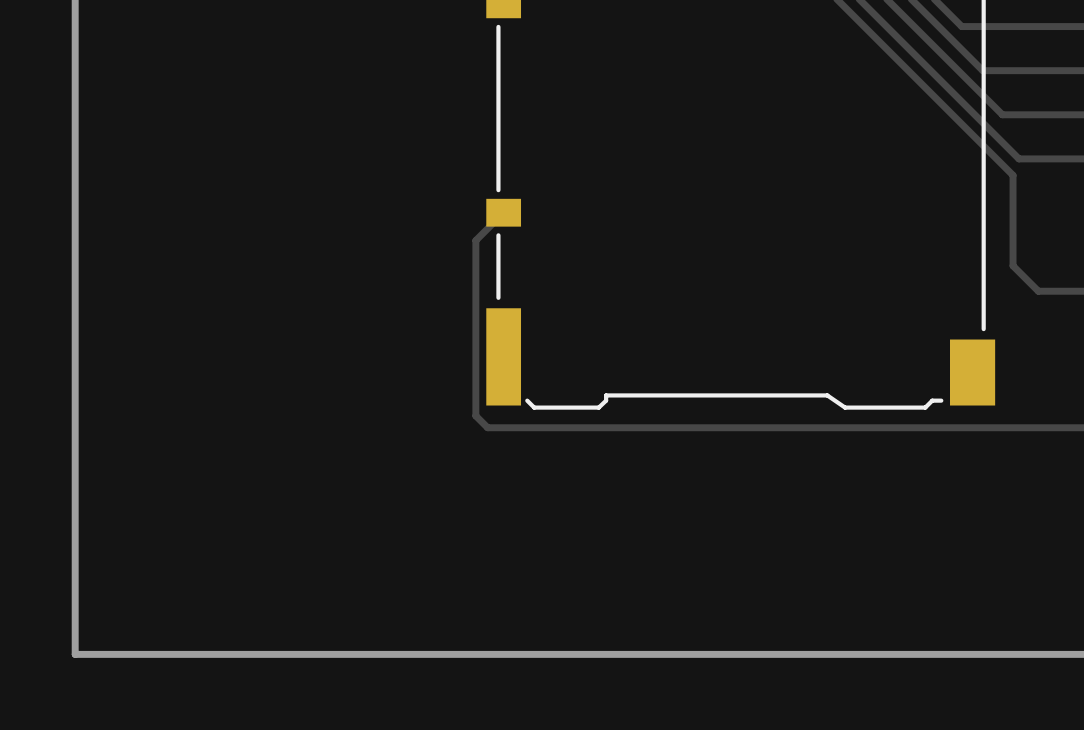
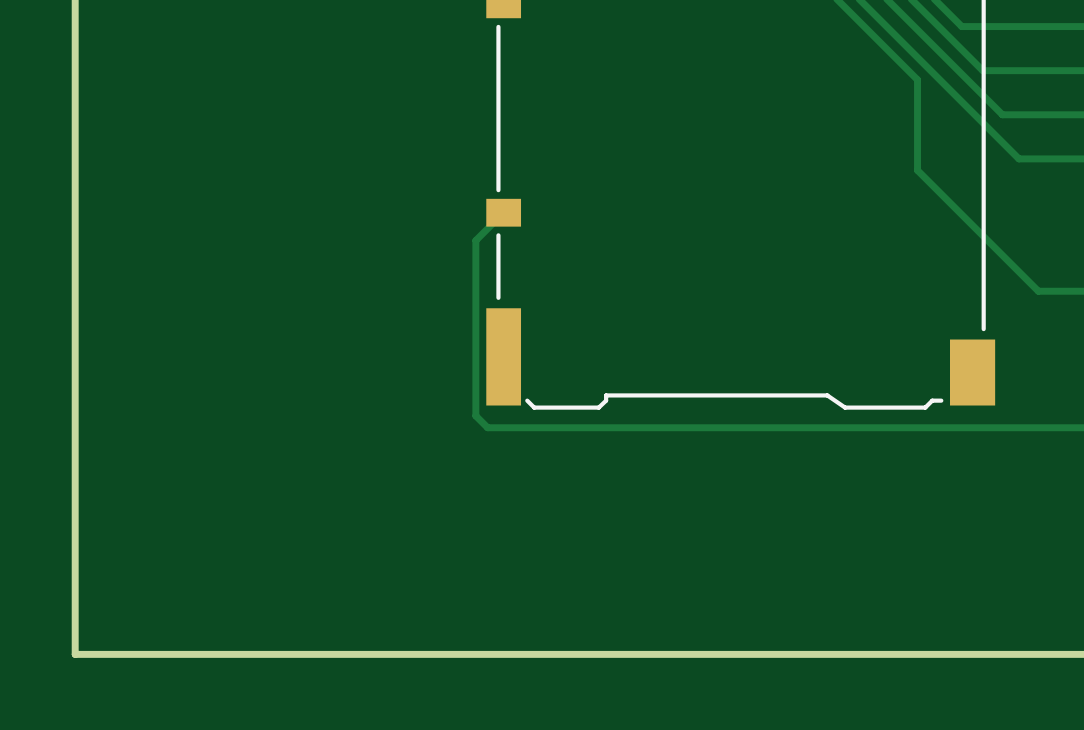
track: (917, 79) (1013, 175) (1013, 265) -> (917, 79) (917, 170) (1013, 265)

